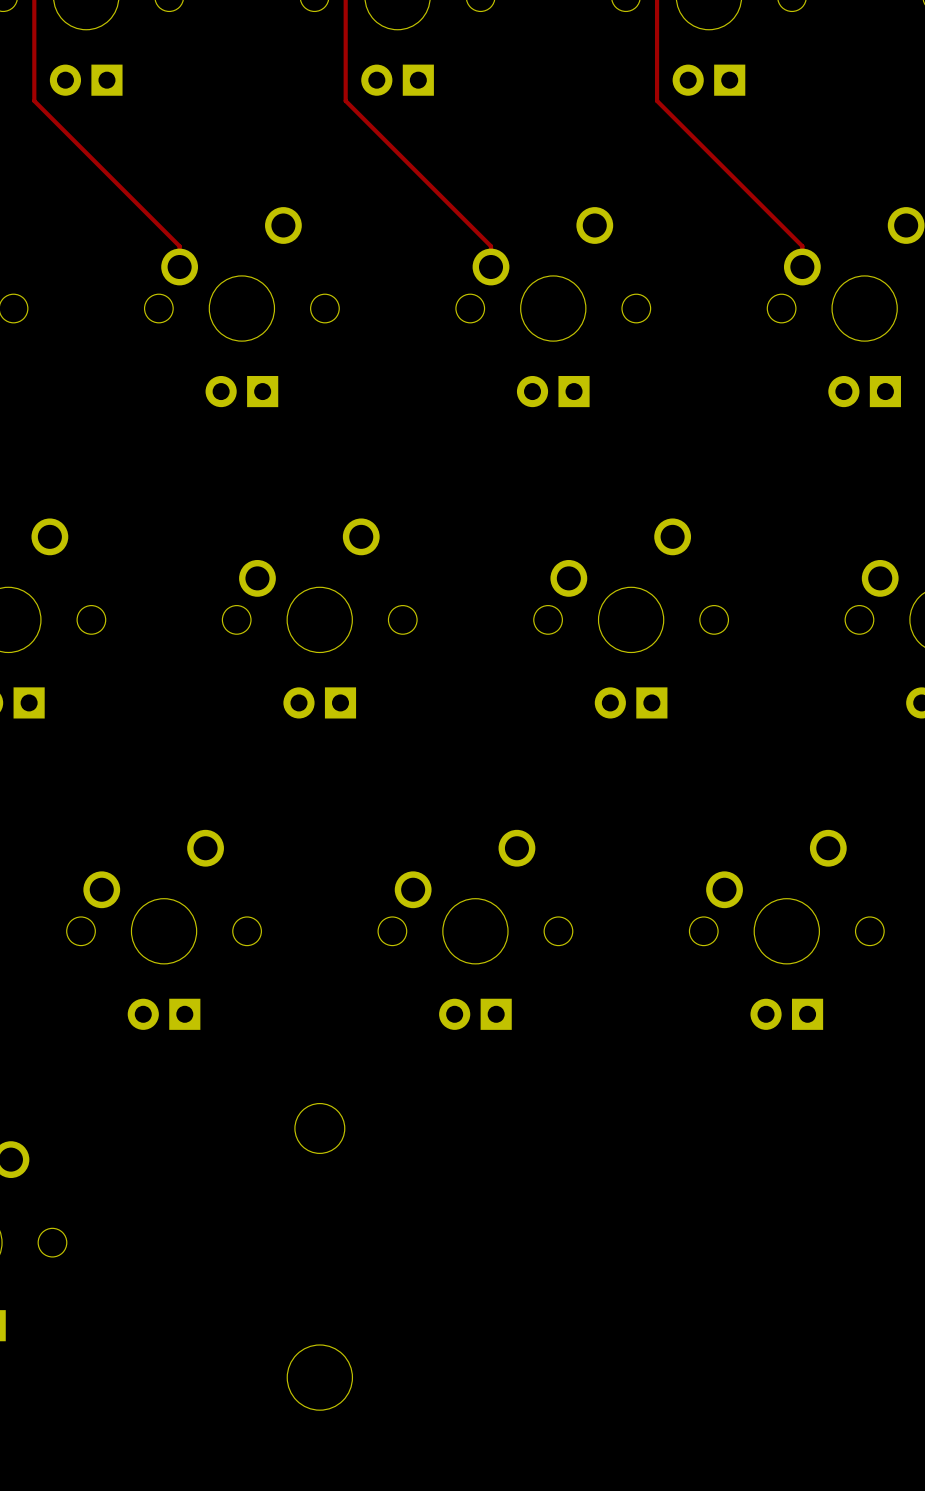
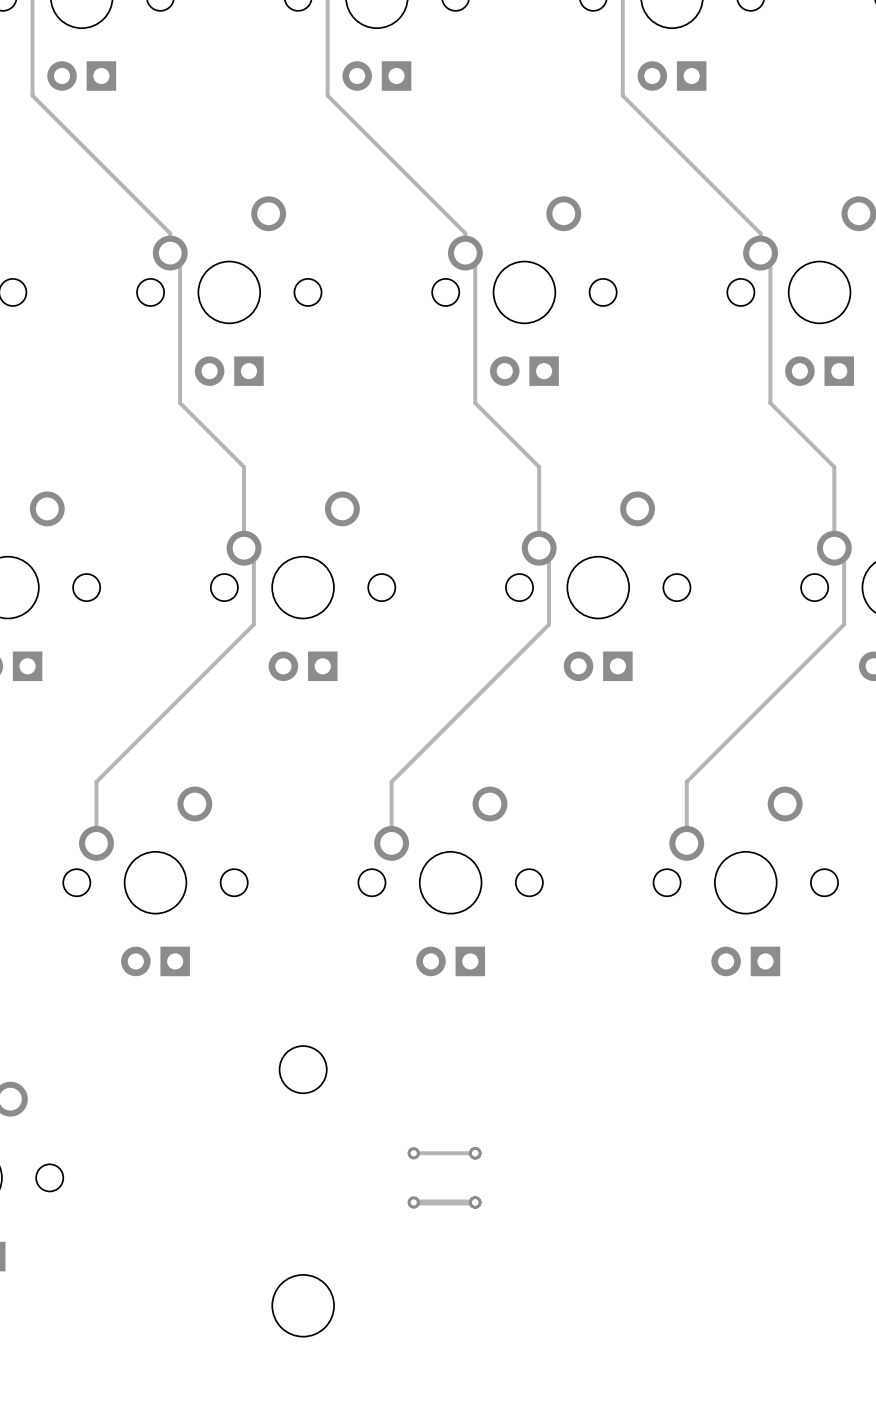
track: none -> (170, 253) (170, 258) (180, 267) (180, 403) (244, 467) (244, 553) (253, 562) (253, 624) (96, 781) (96, 843)
track: none -> (465, 253) (465, 258) (475, 267) (475, 403) (539, 467) (539, 553) (549, 562) (549, 624) (391, 781) (391, 843)
track: none -> (760, 253) (760, 258) (770, 267) (770, 403) (834, 467) (834, 553) (844, 562) (844, 624) (686, 781) (686, 843)
track: none -> (413, 1153) (475, 1153)
via: none -> (413, 1153)
via: none -> (475, 1153)
track: none -> (413, 1202) (475, 1202)
via: none -> (413, 1202)
via: none -> (475, 1202)

